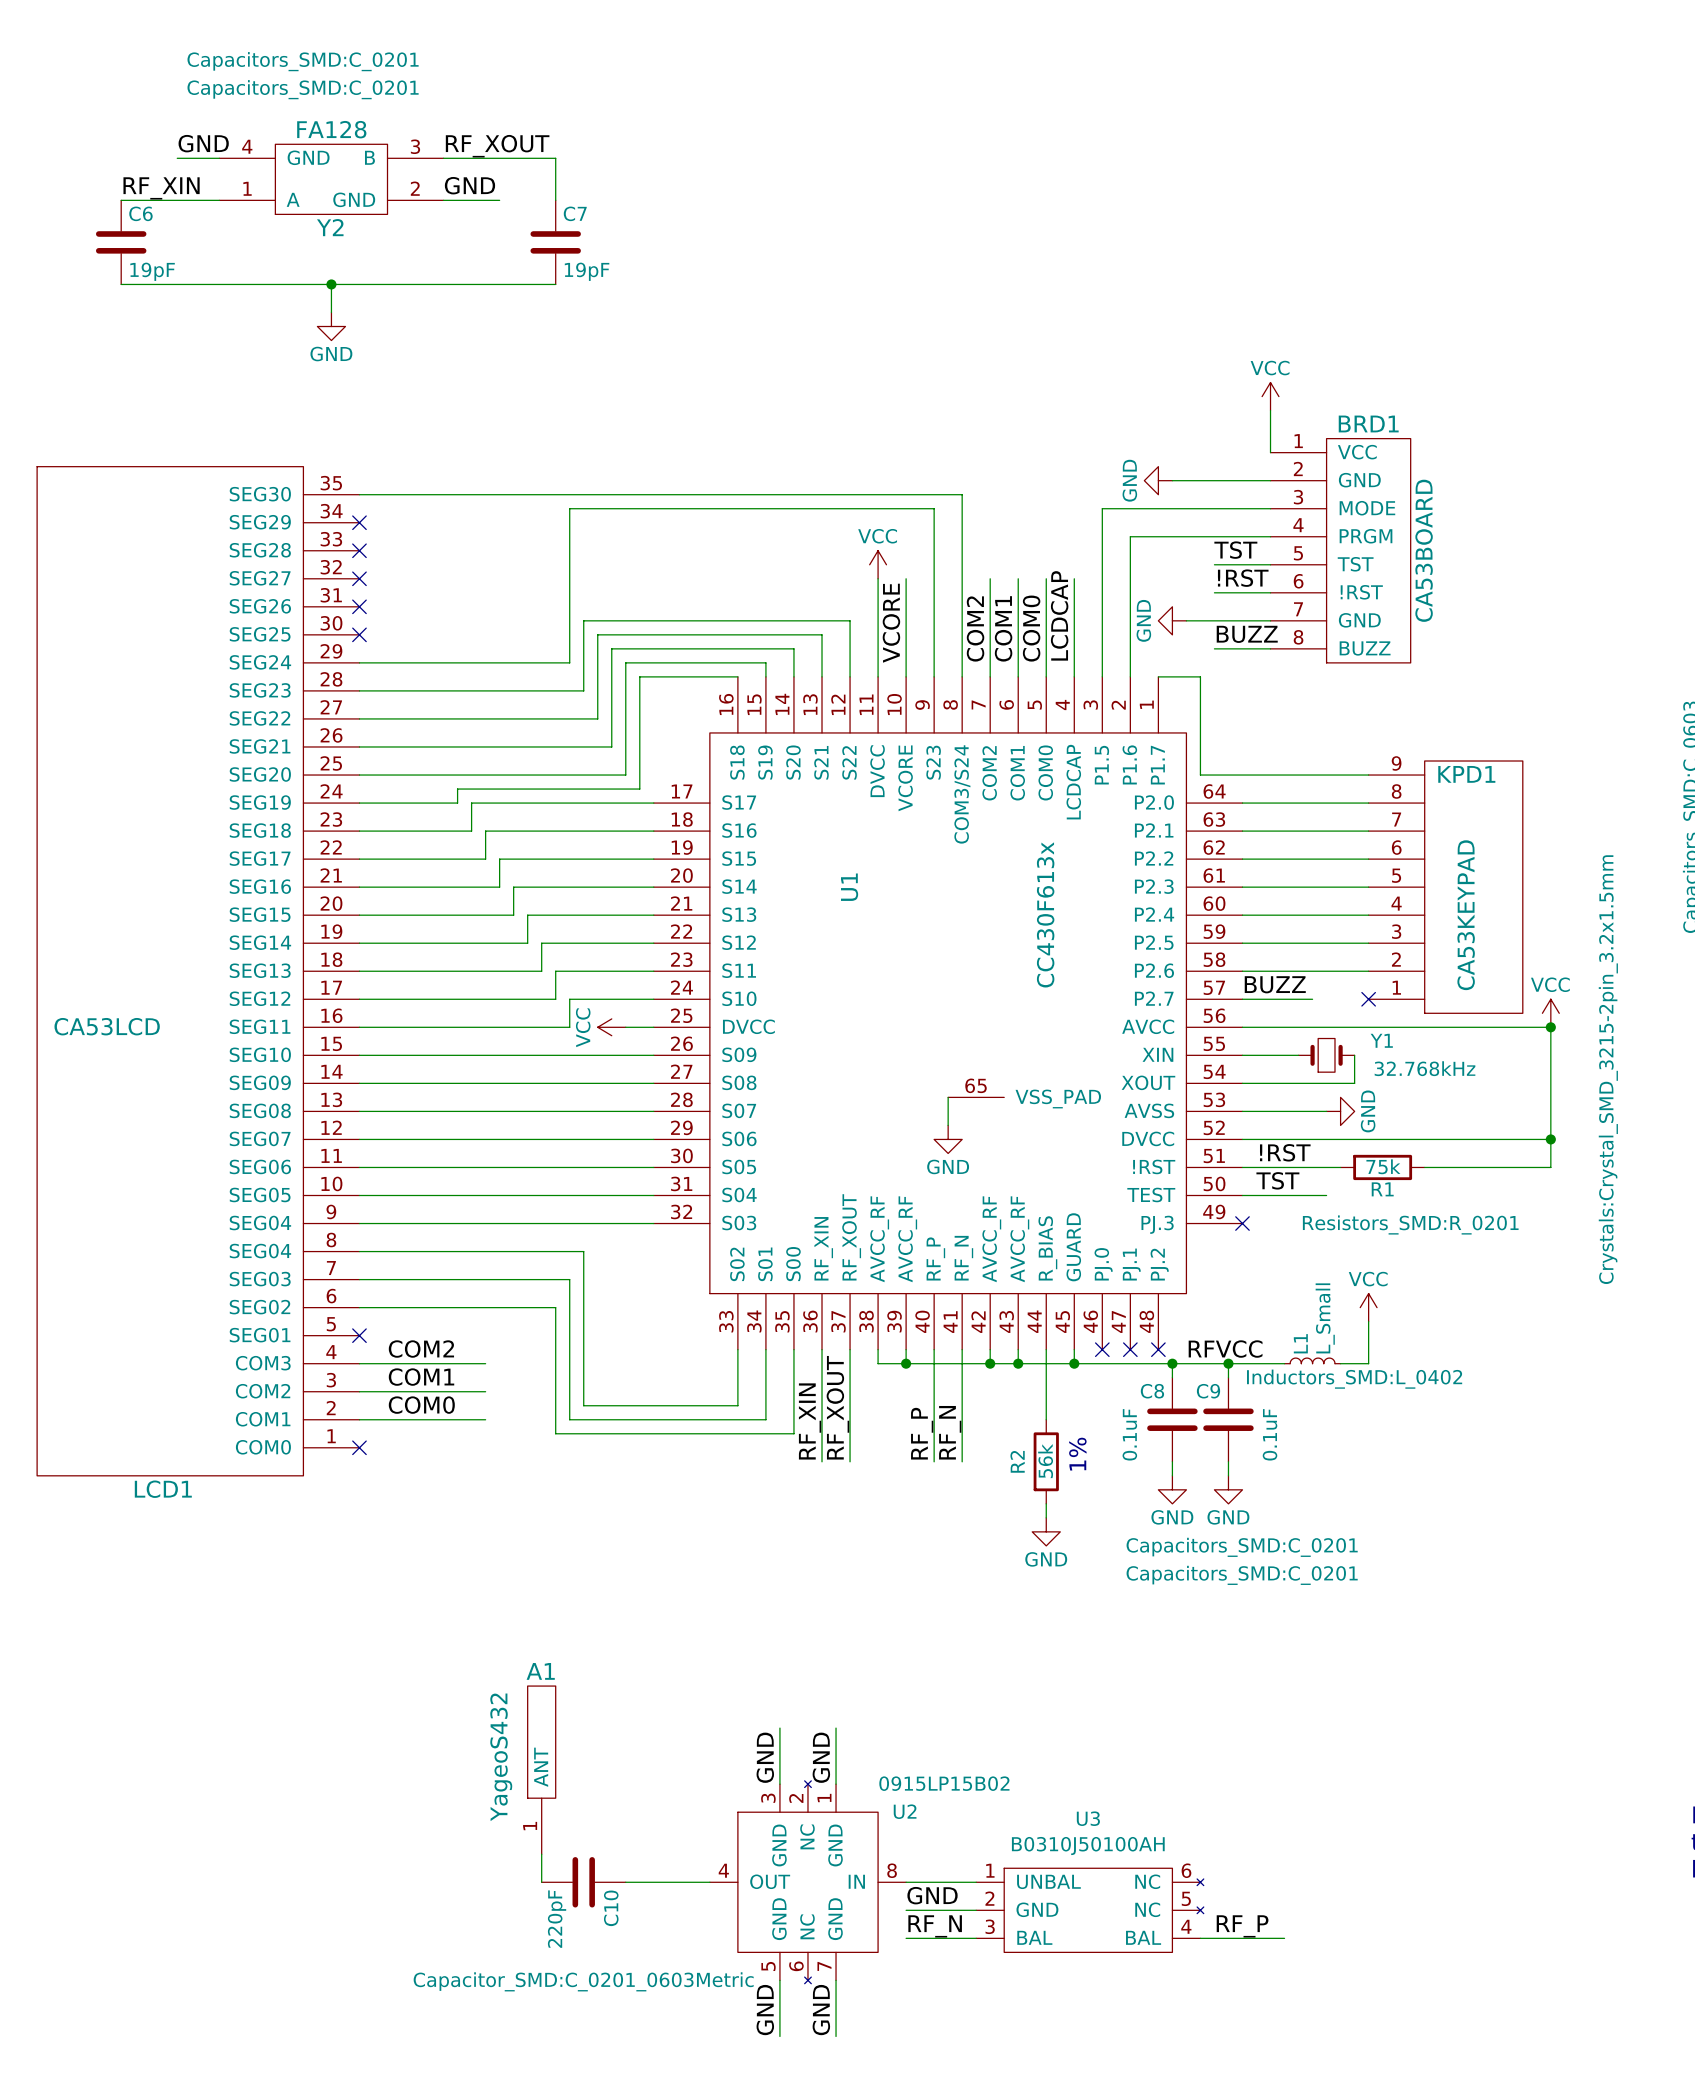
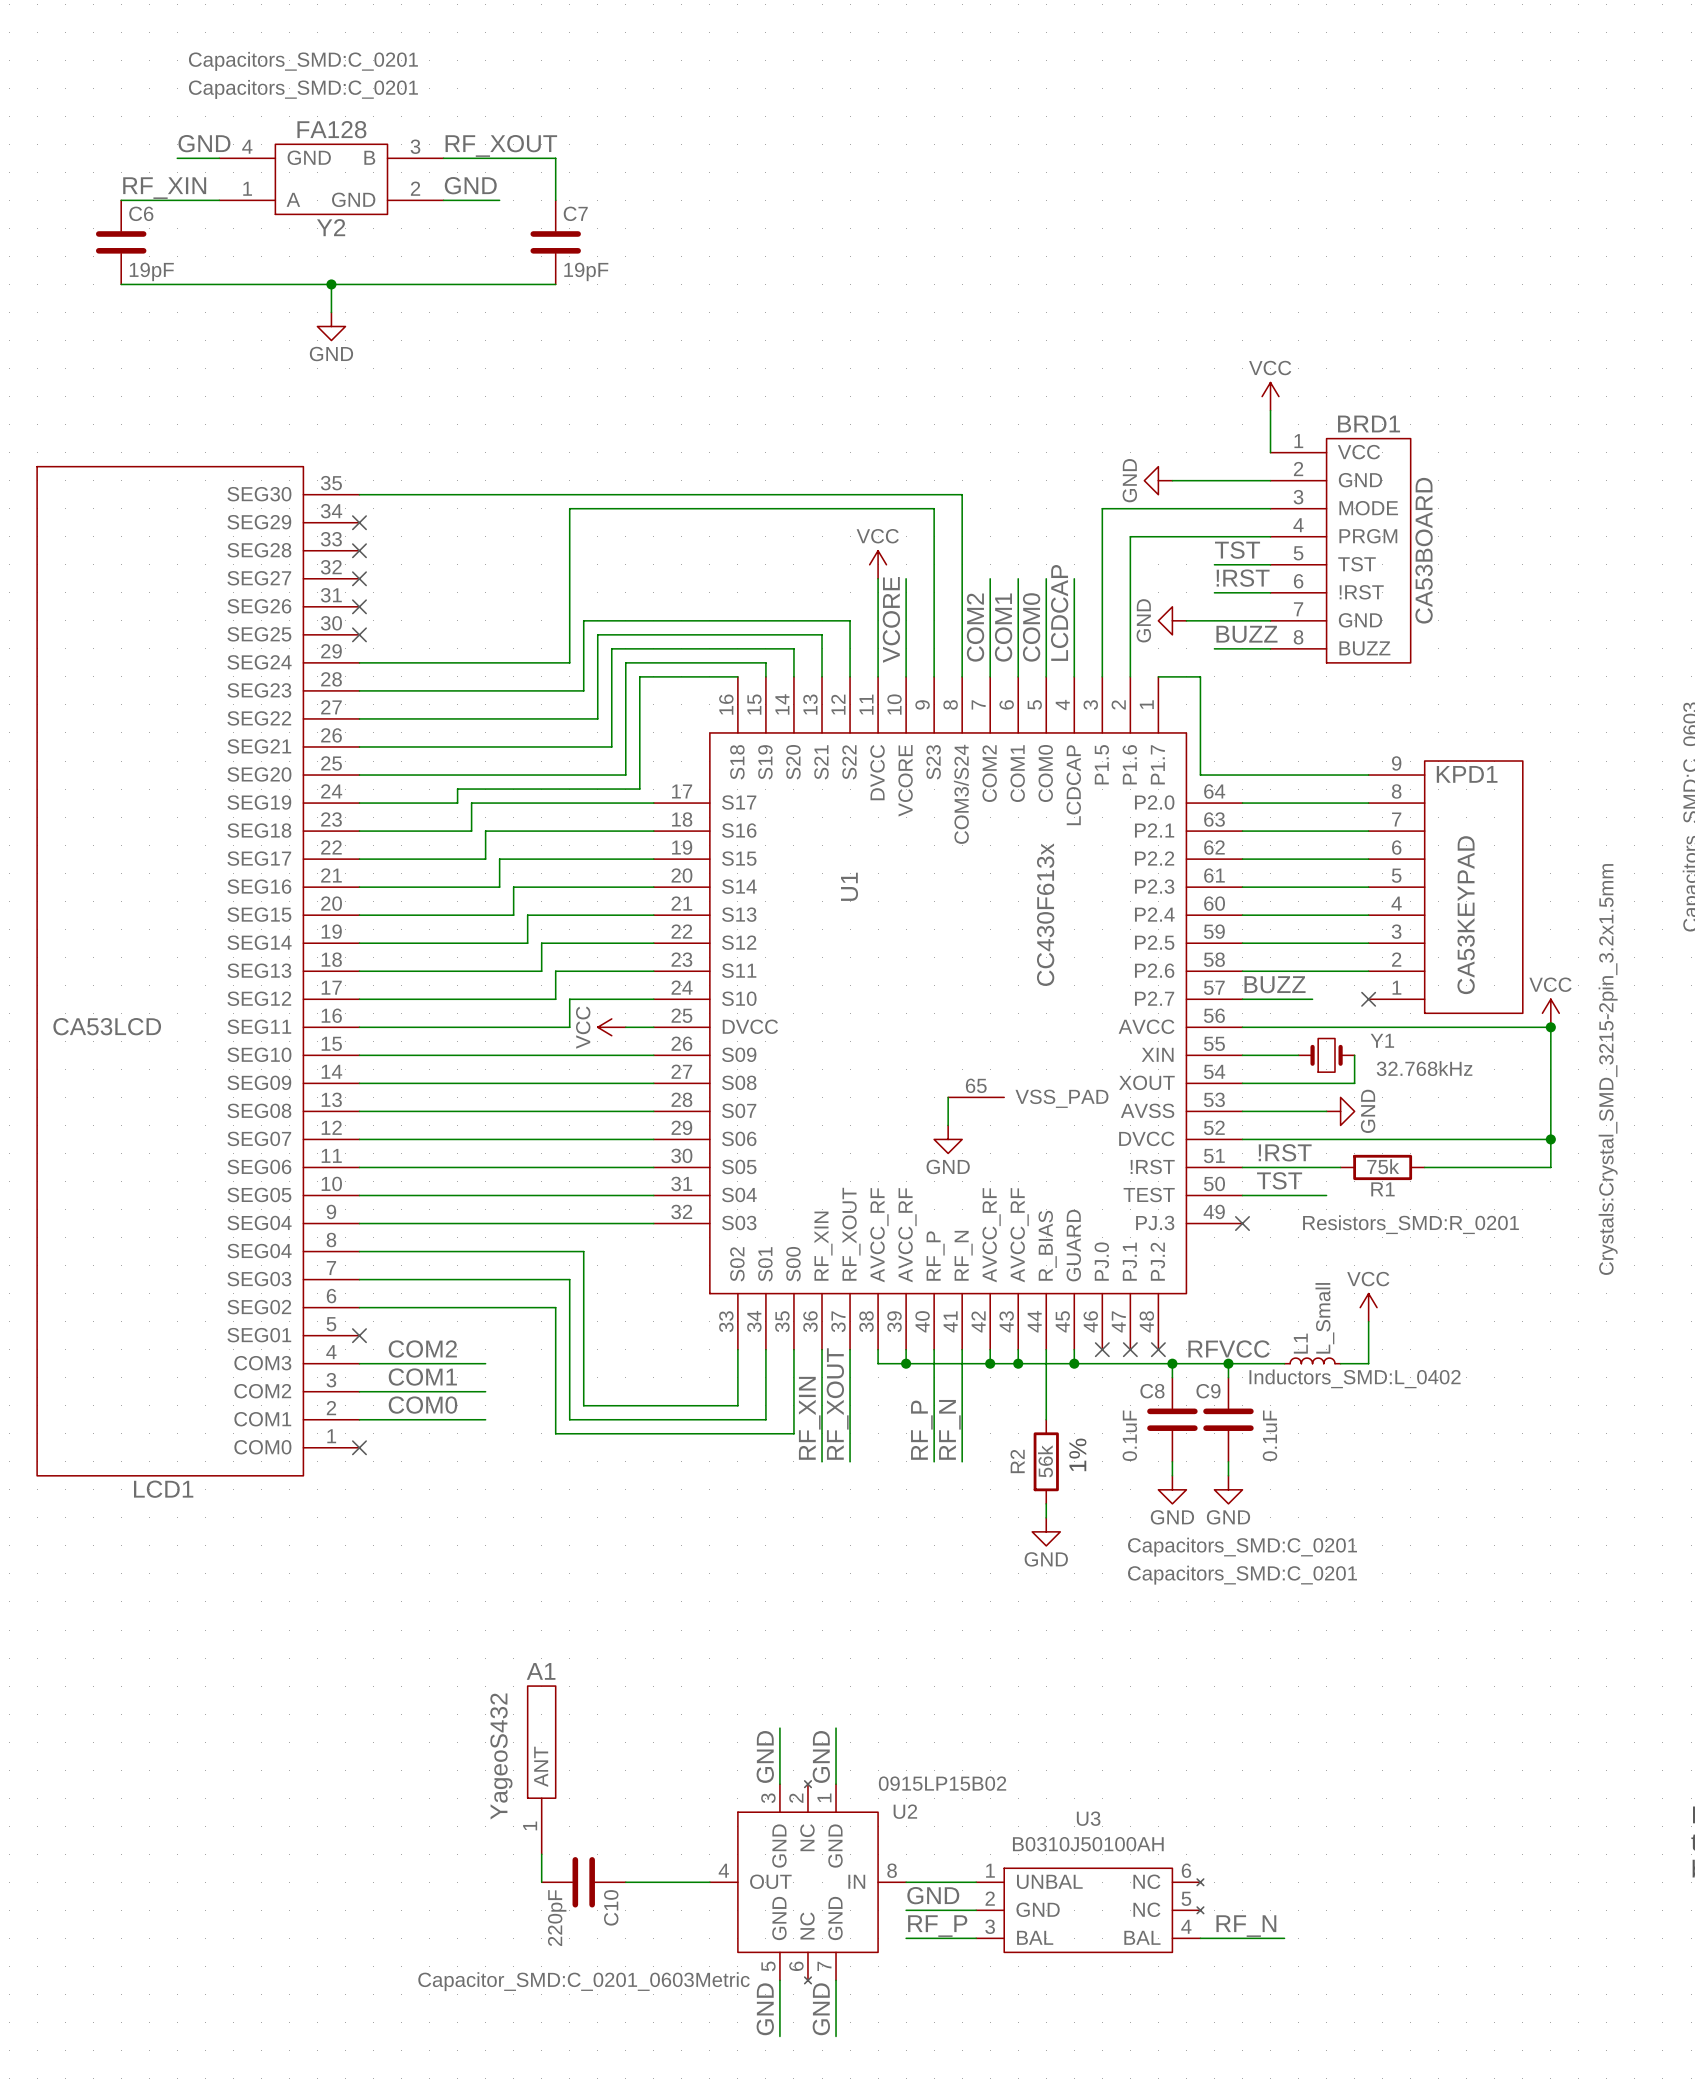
label: RF_N (935, 1926) -> RF_P (937, 1926)
label: RF_P (1242, 1926) -> RF_N (1246, 1926)

